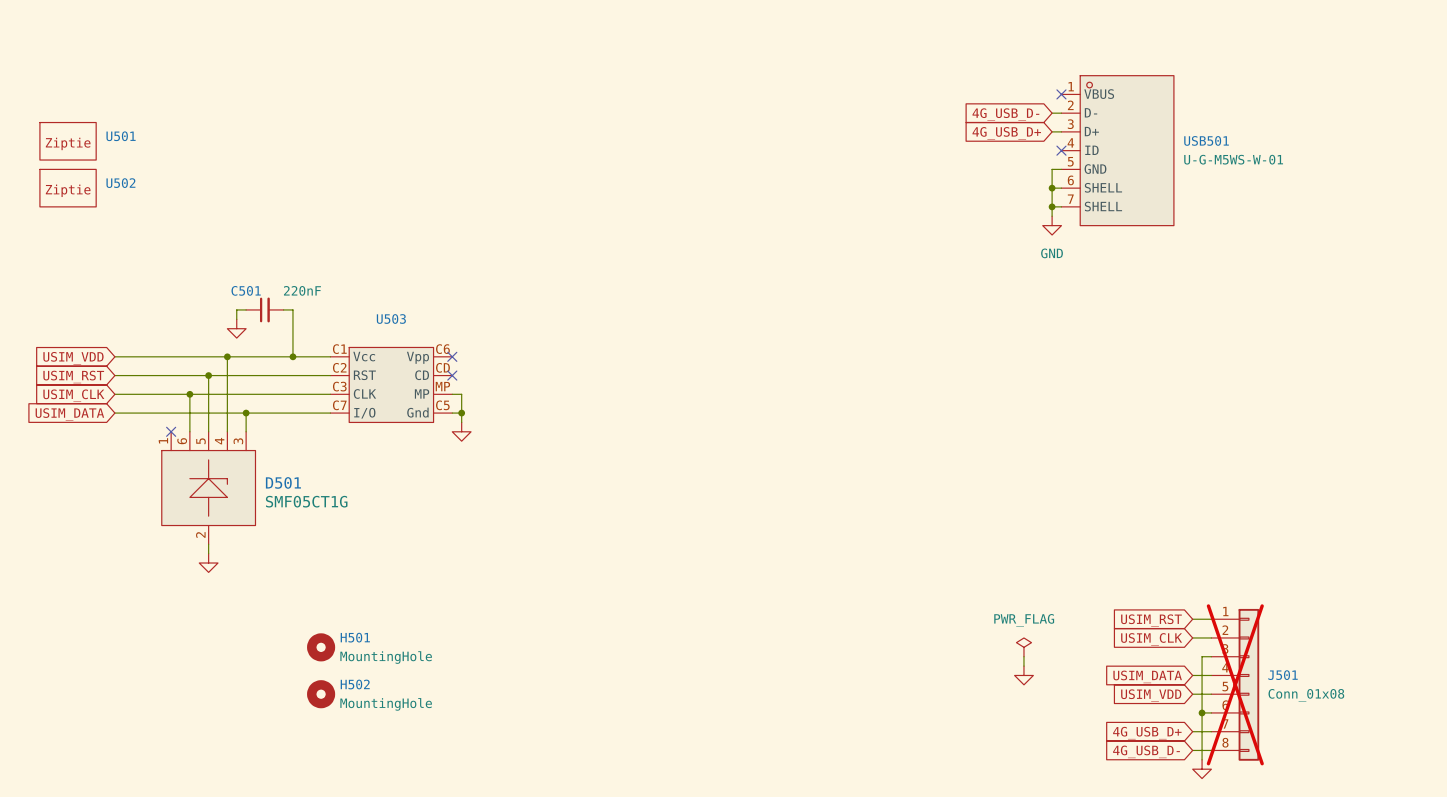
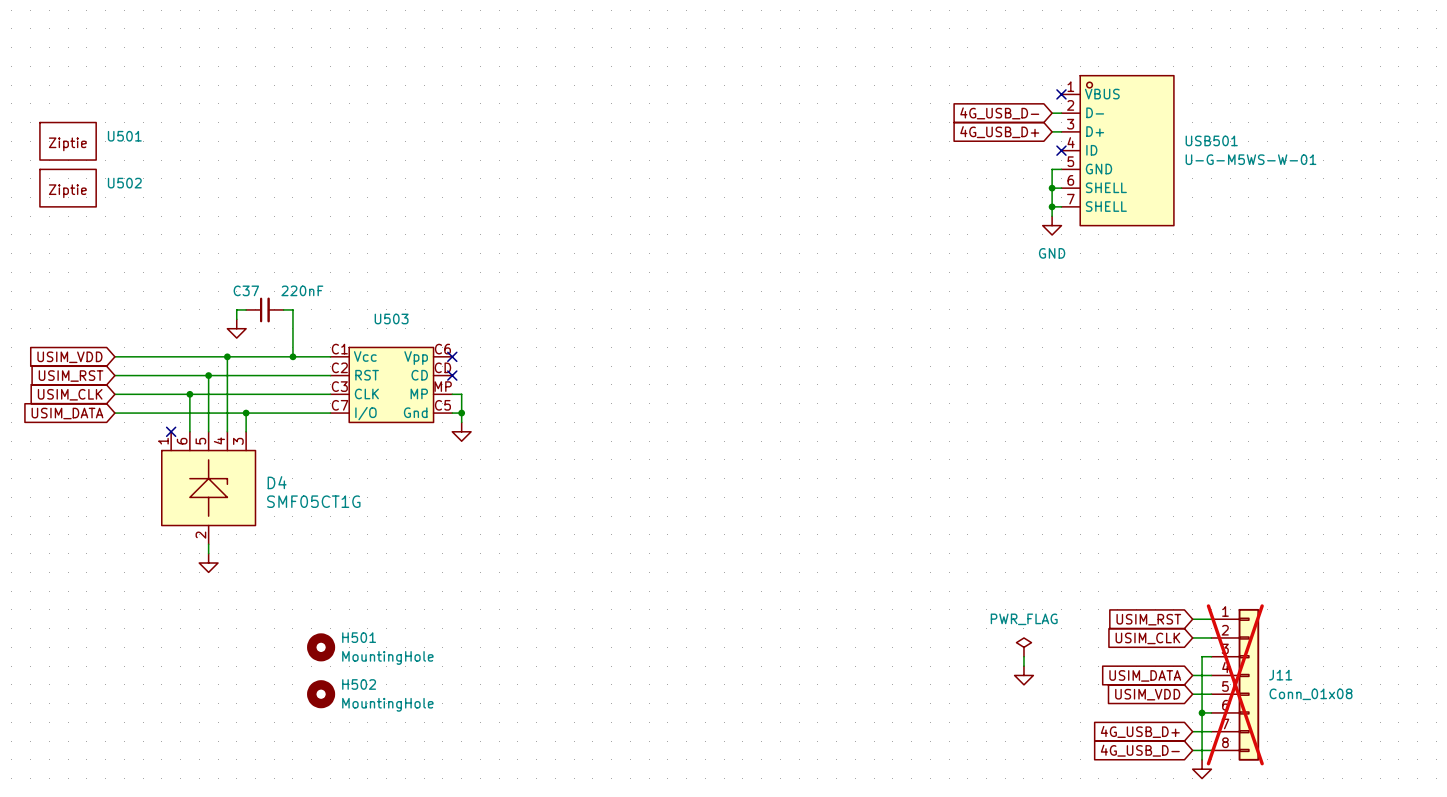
C501 name: C501 (246, 290) -> C37 (246, 290)
D501 name: D501 (283, 482) -> D4 (277, 482)
J501 name: J501 (1283, 675) -> J11 (1280, 675)

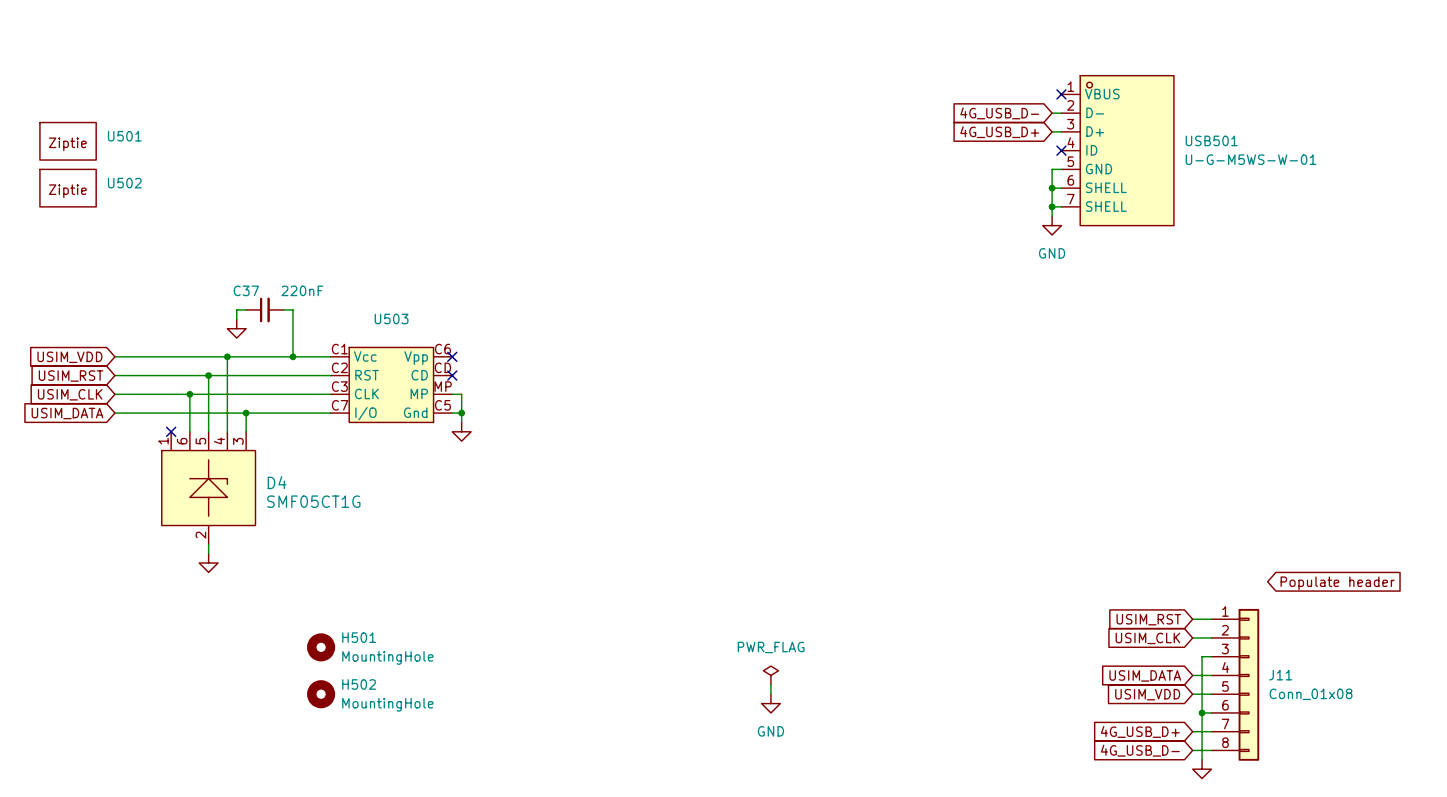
global label: none -> Populate header (1337, 583)
power symbol: PWR_FLAG (1023, 647) -> none
wire: (1023, 656) (1023, 666) -> none
power symbol: none -> PWR_FLAG (770, 675)
power symbol: (1023, 675) -> none
wire: none -> (770, 684) (770, 694)
J11 do-not-place cross: (1235, 684) -> none
power symbol: none -> GND (770, 703)

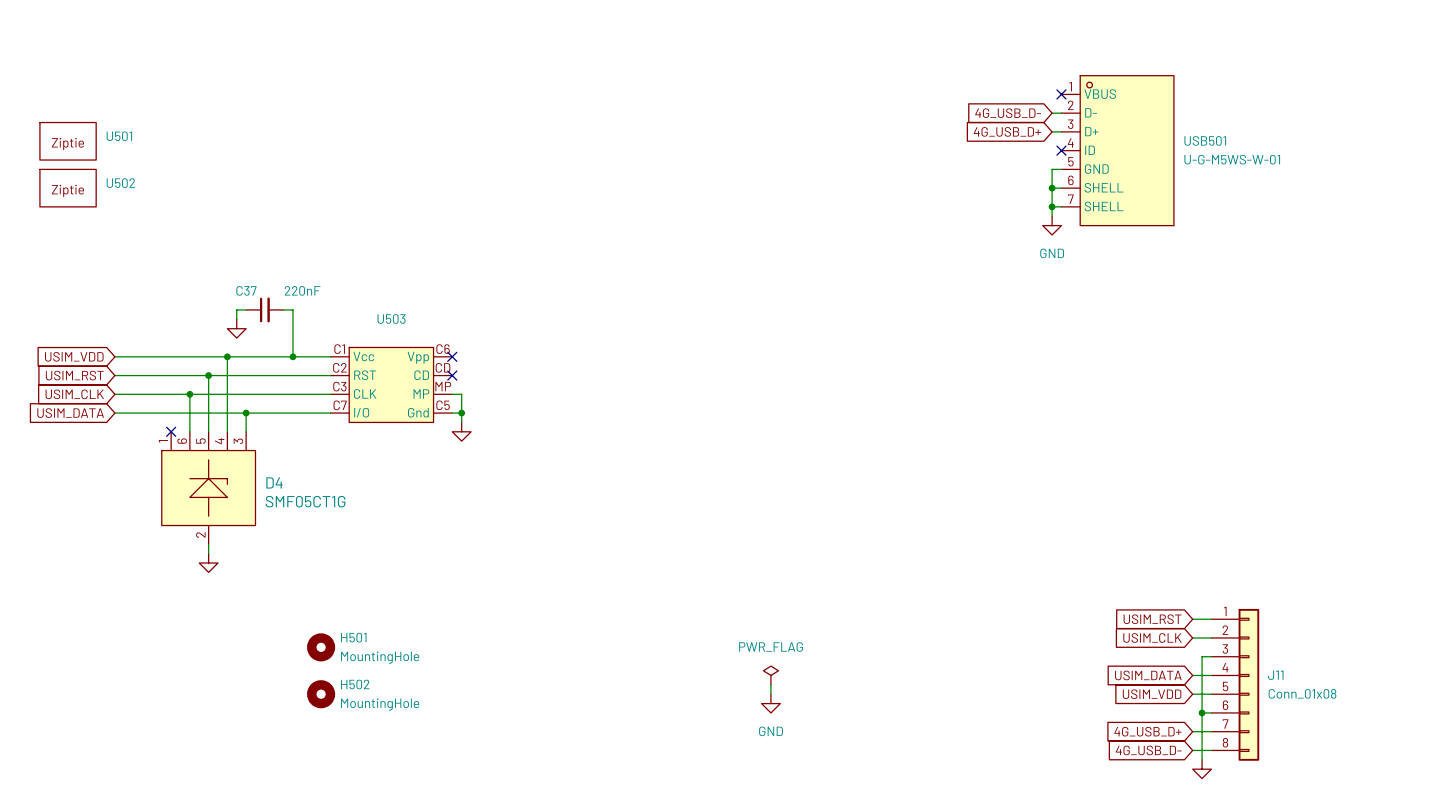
global label: Populate header (1337, 583) -> none

